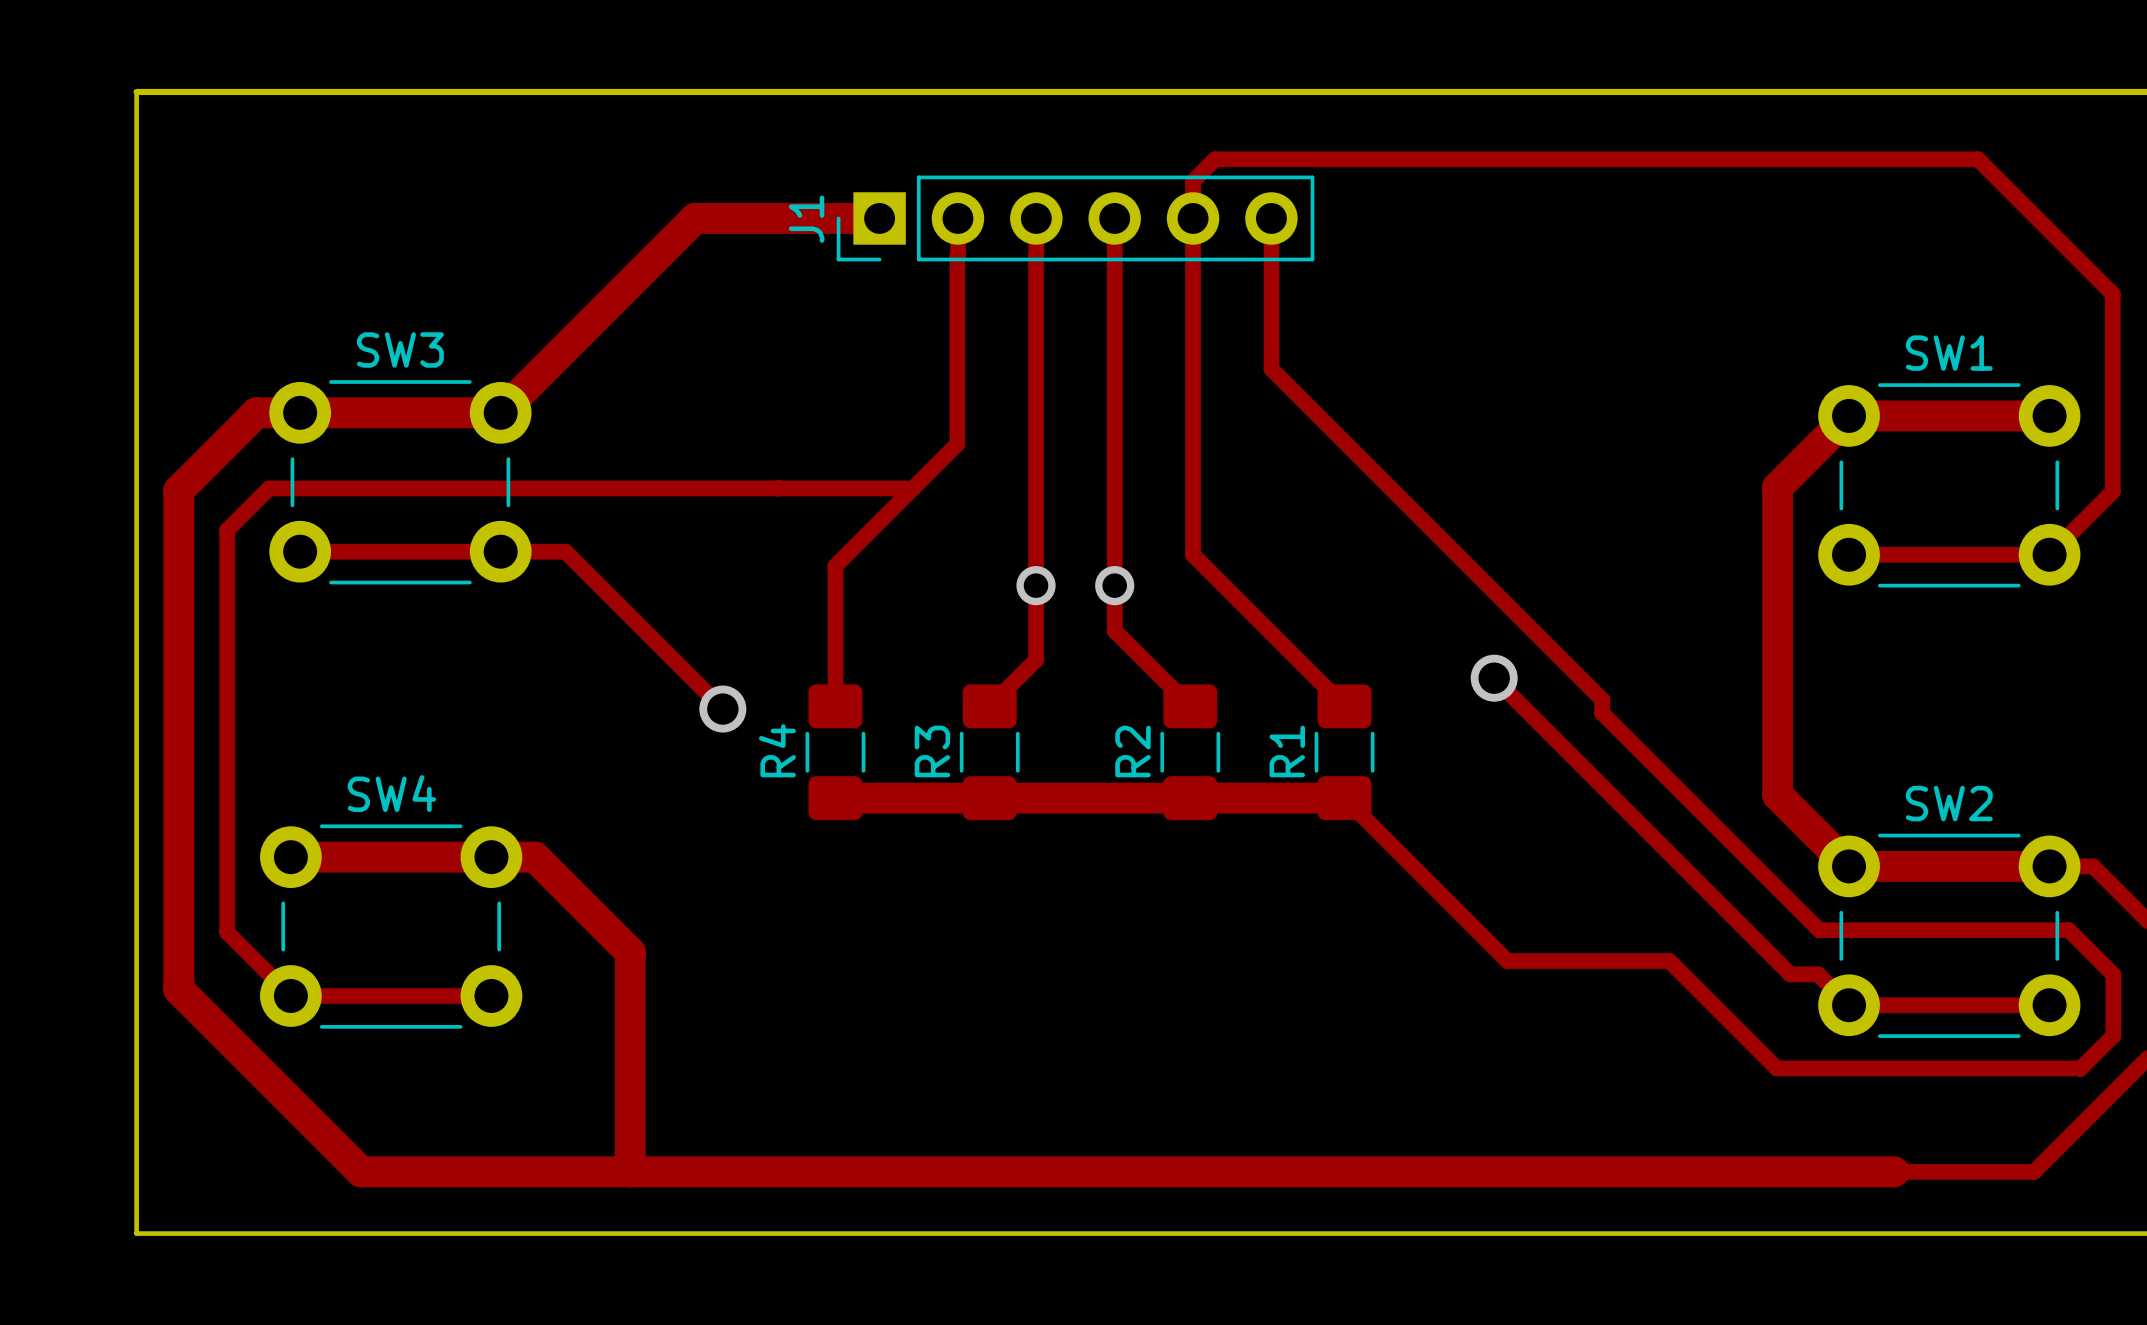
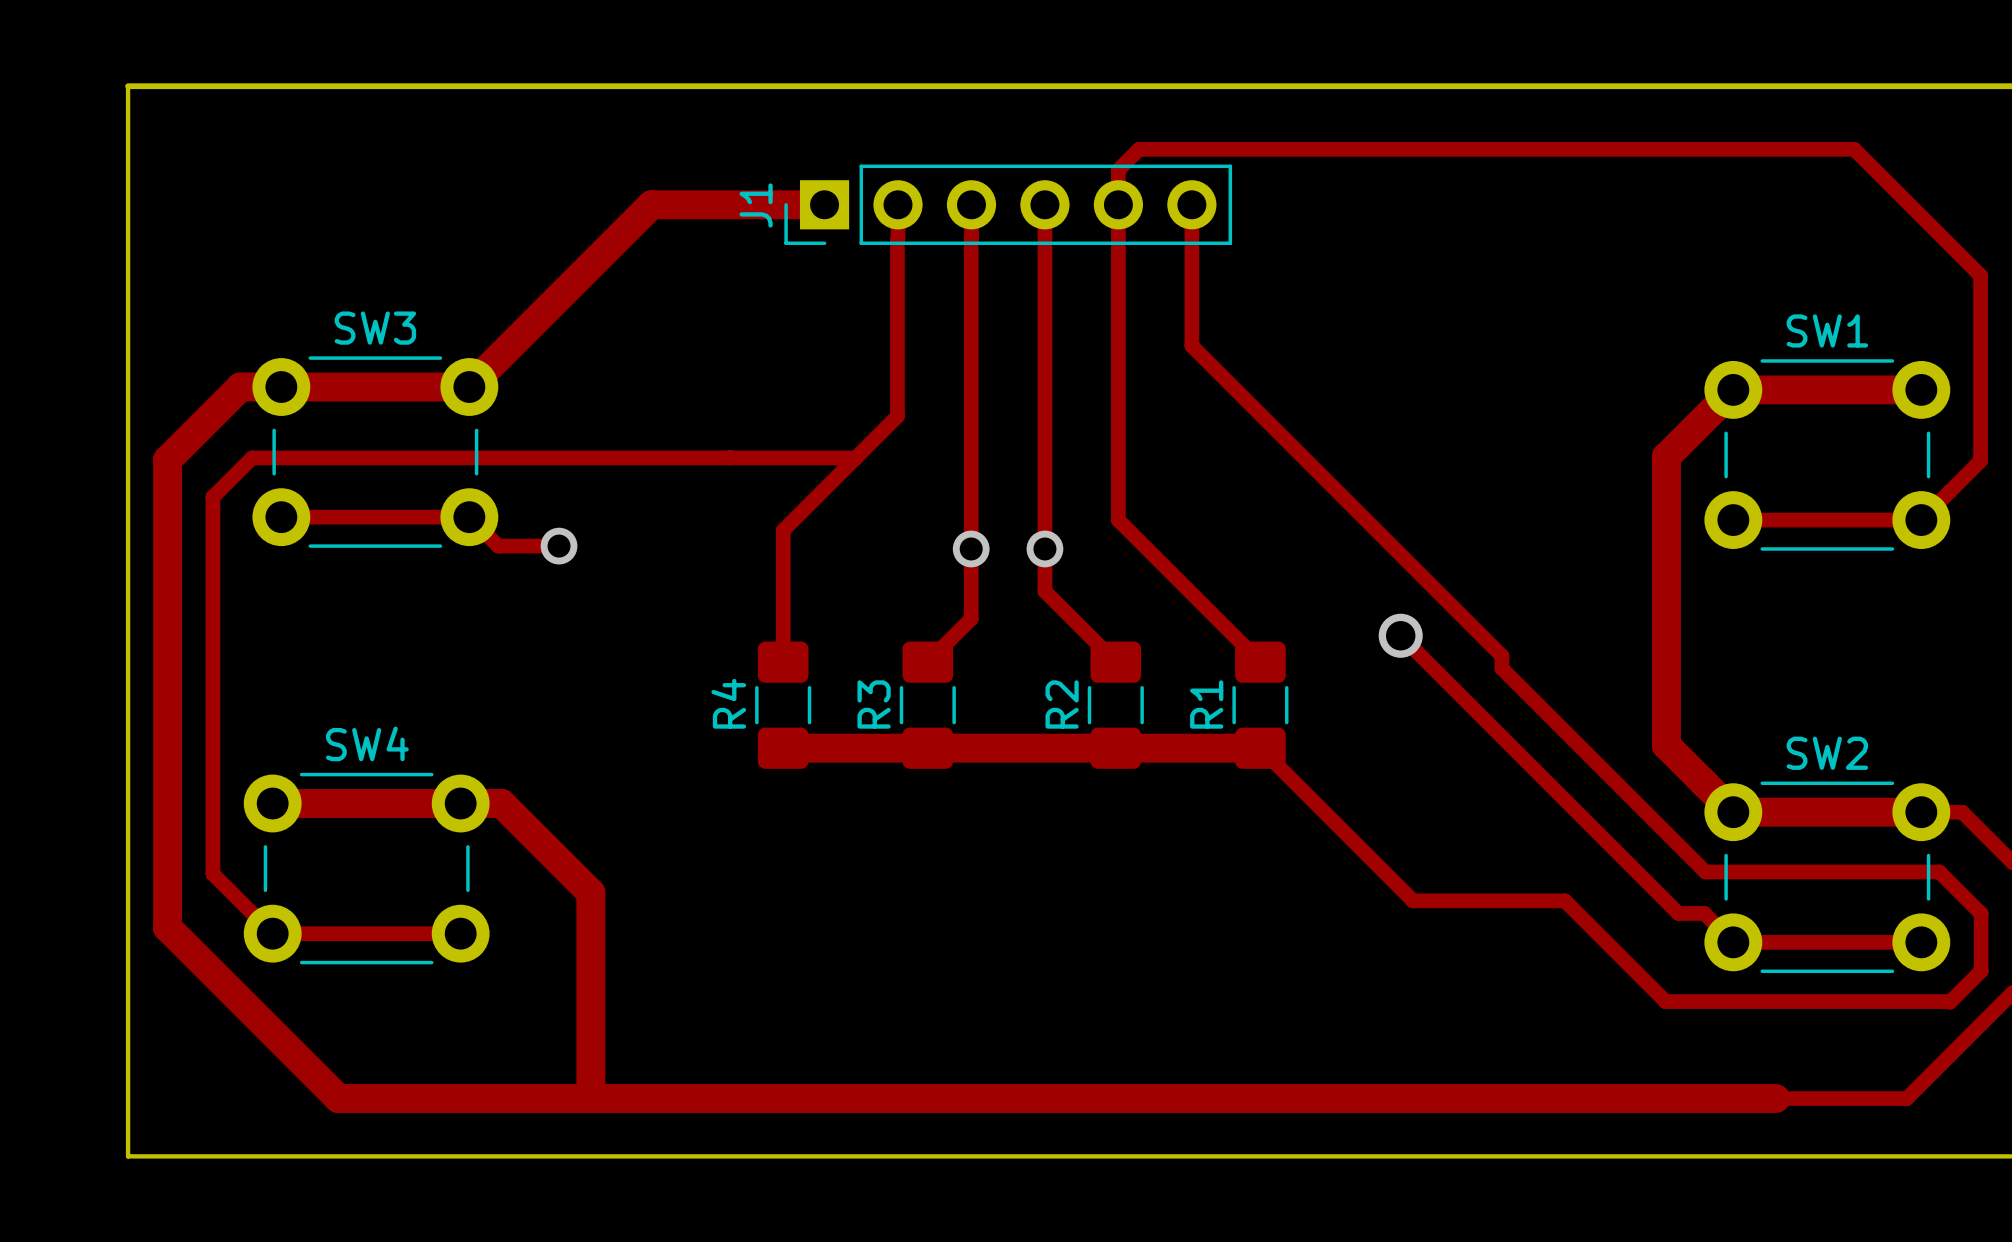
track: (500, 551) (565, 551) (722, 709) -> (469, 517) (498, 546) (559, 546)
via: none -> (559, 546)
via: (722, 709) -> none

